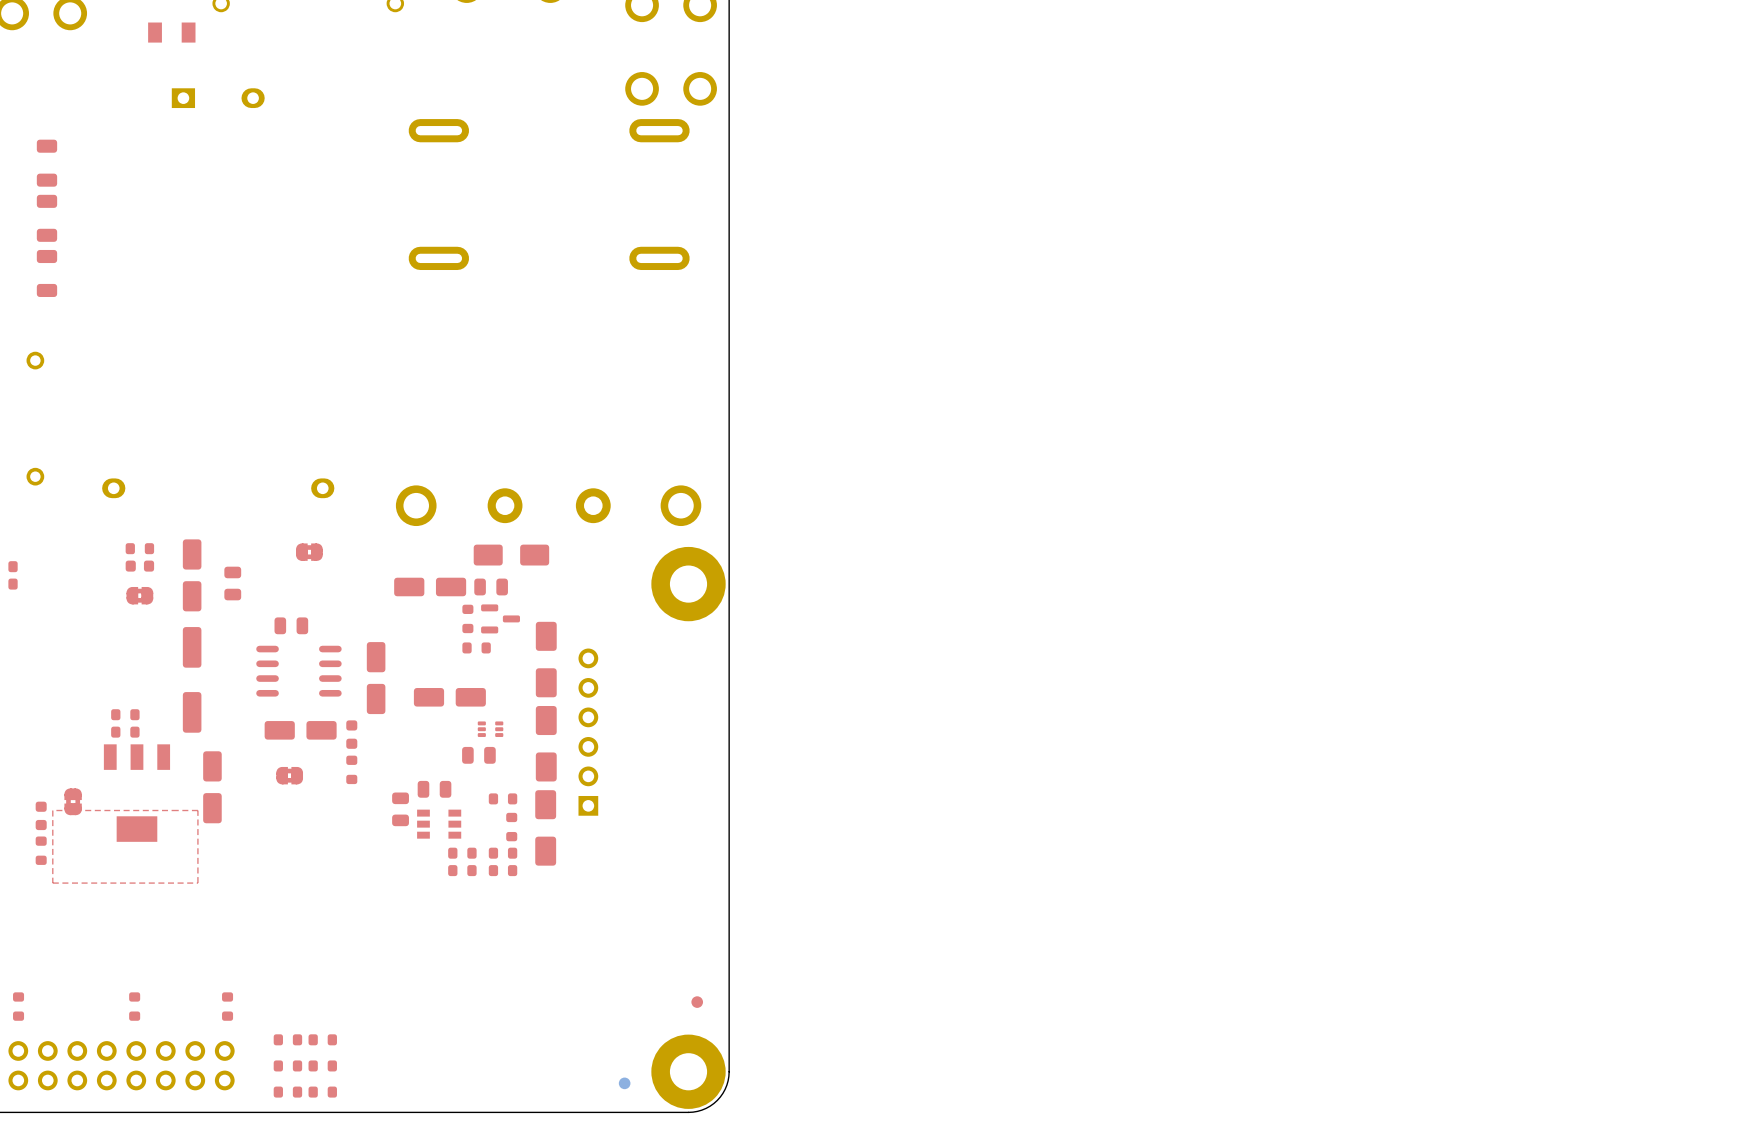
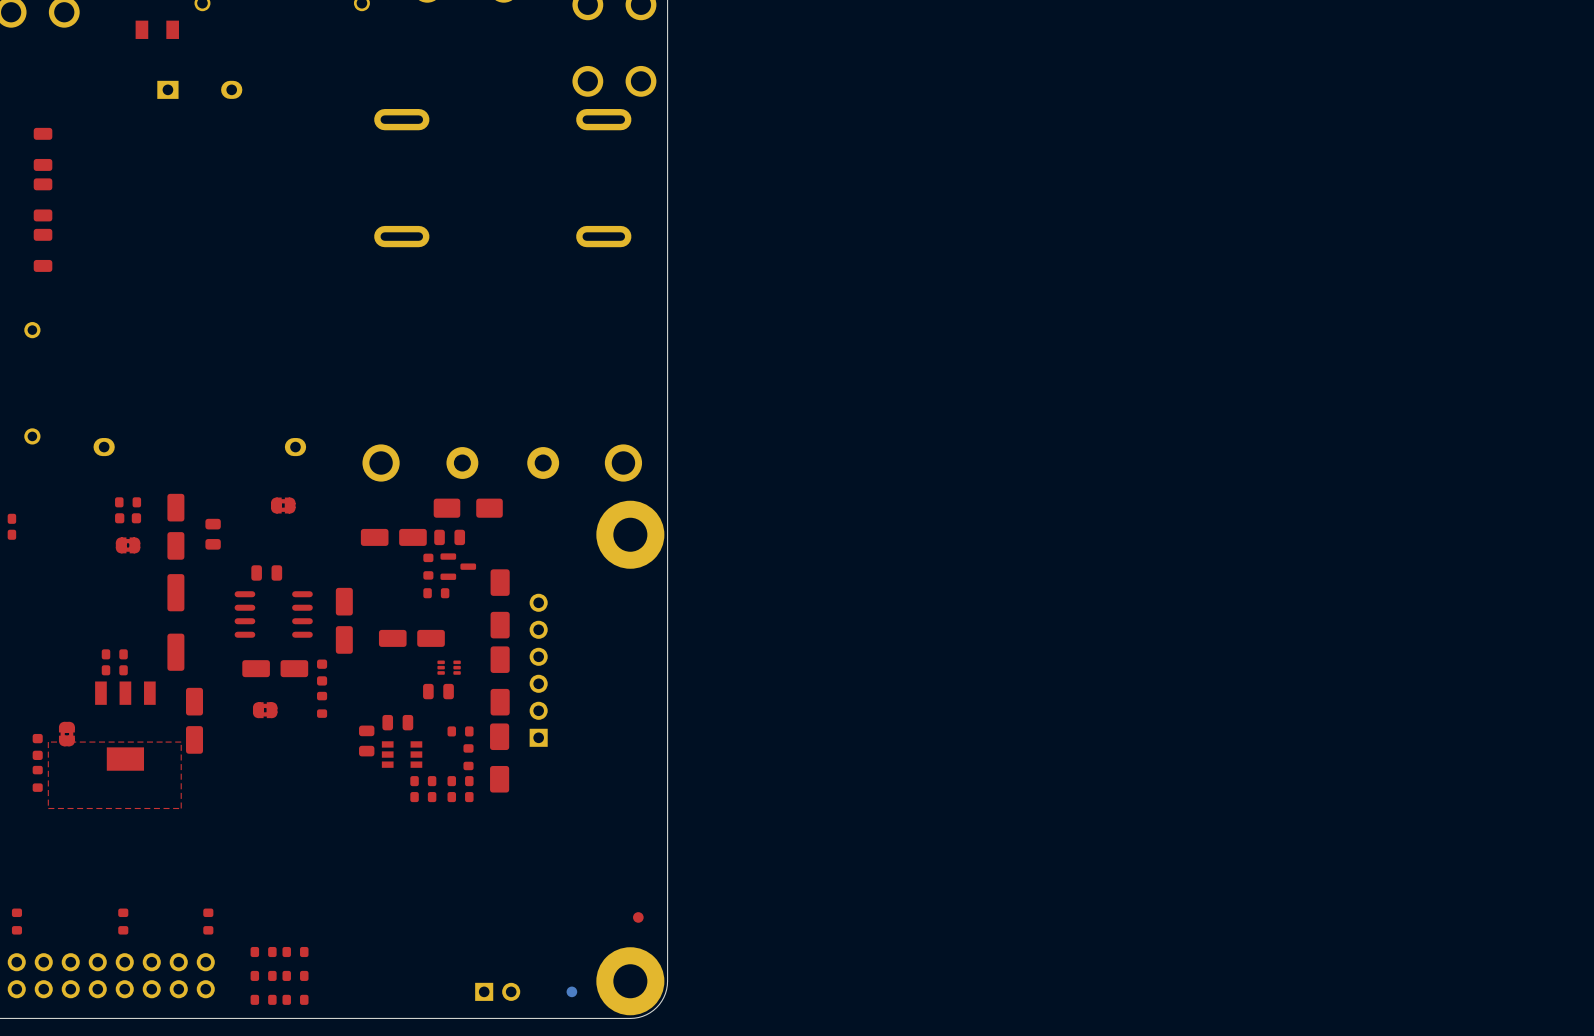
part: none -> (497, 991)

